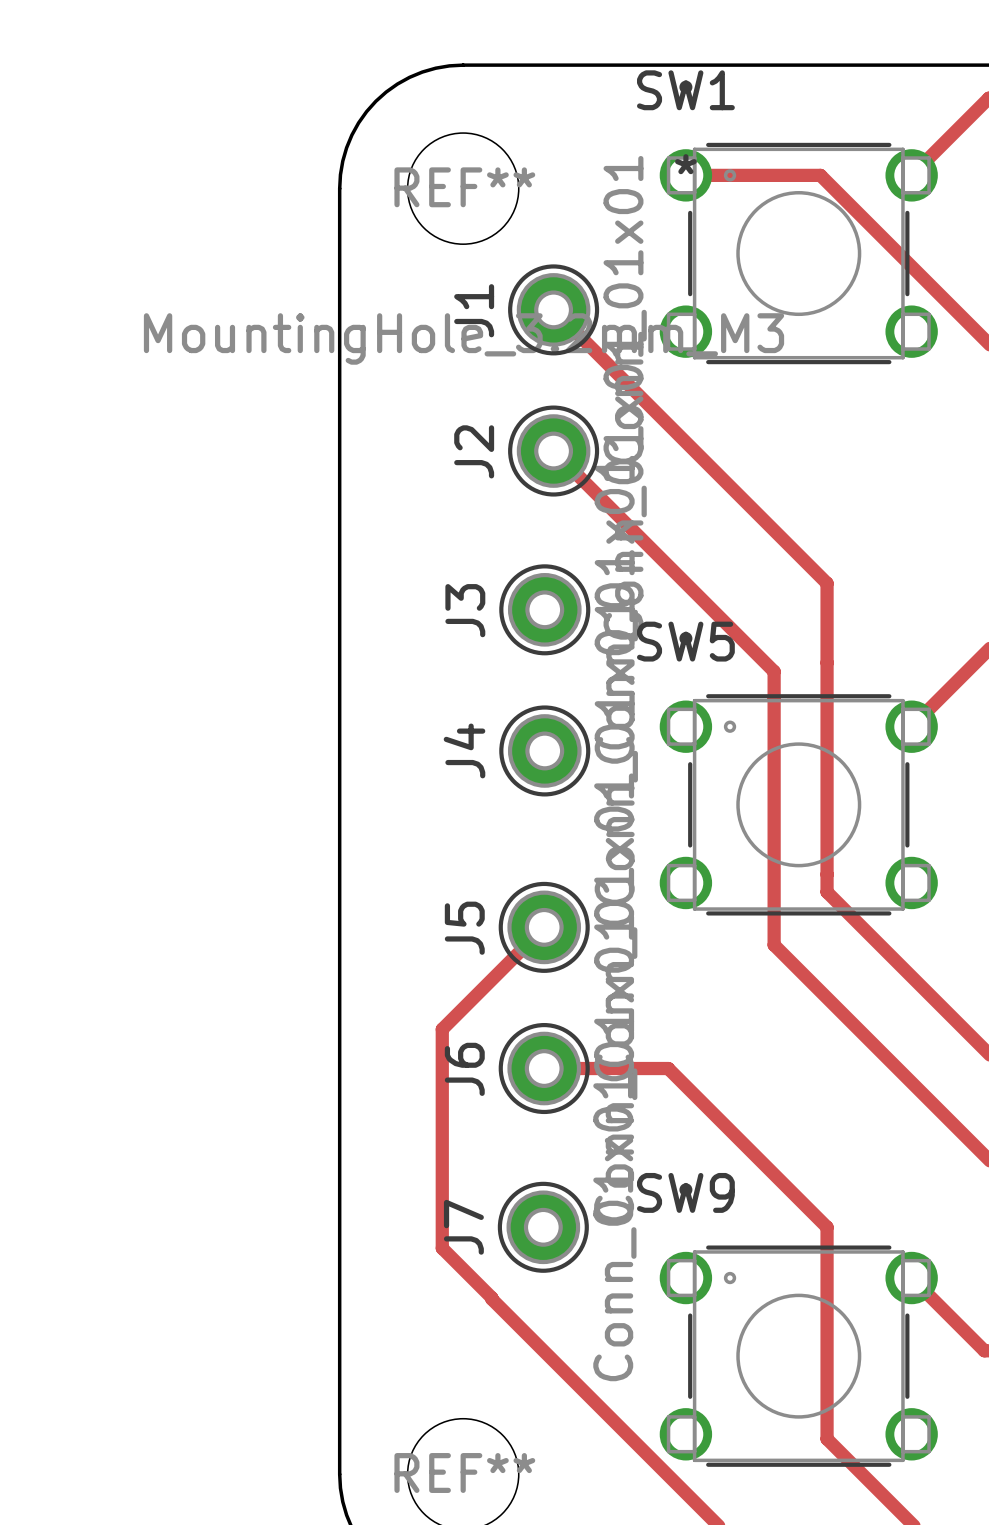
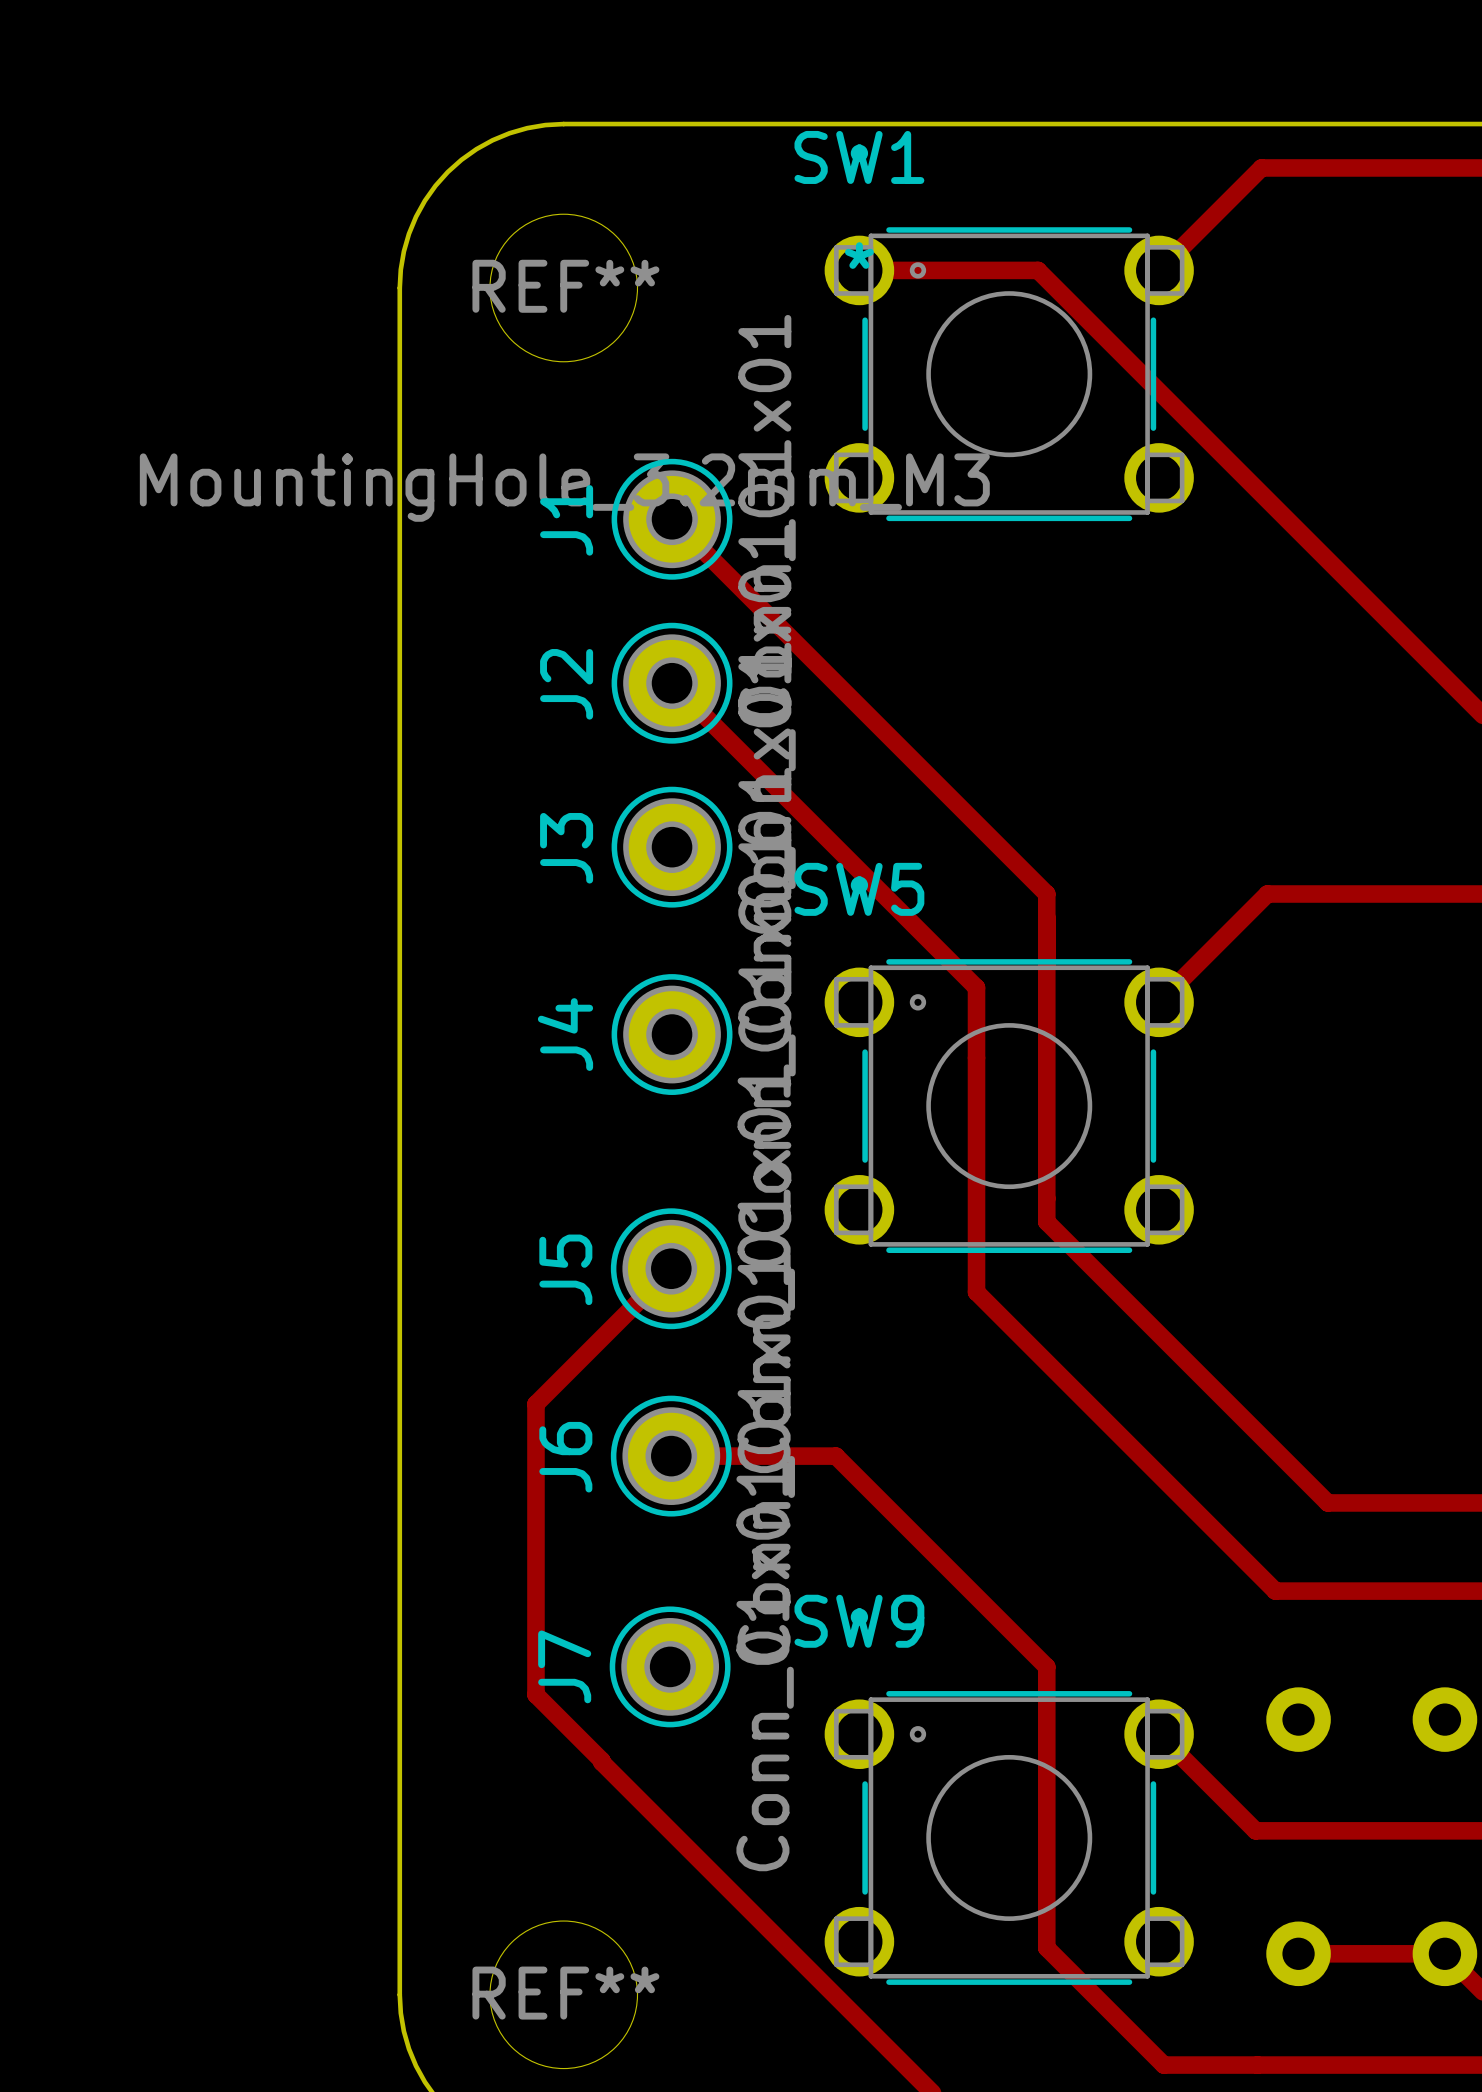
track: (553, 309) (827, 583) (827, 645) -> (672, 519) (1046, 894)
J1 position: (553, 309) -> (672, 519)
track: (553, 451) (774, 671) (774, 715) -> (672, 683) (976, 987)
J2 position: (553, 451) -> (672, 683)

